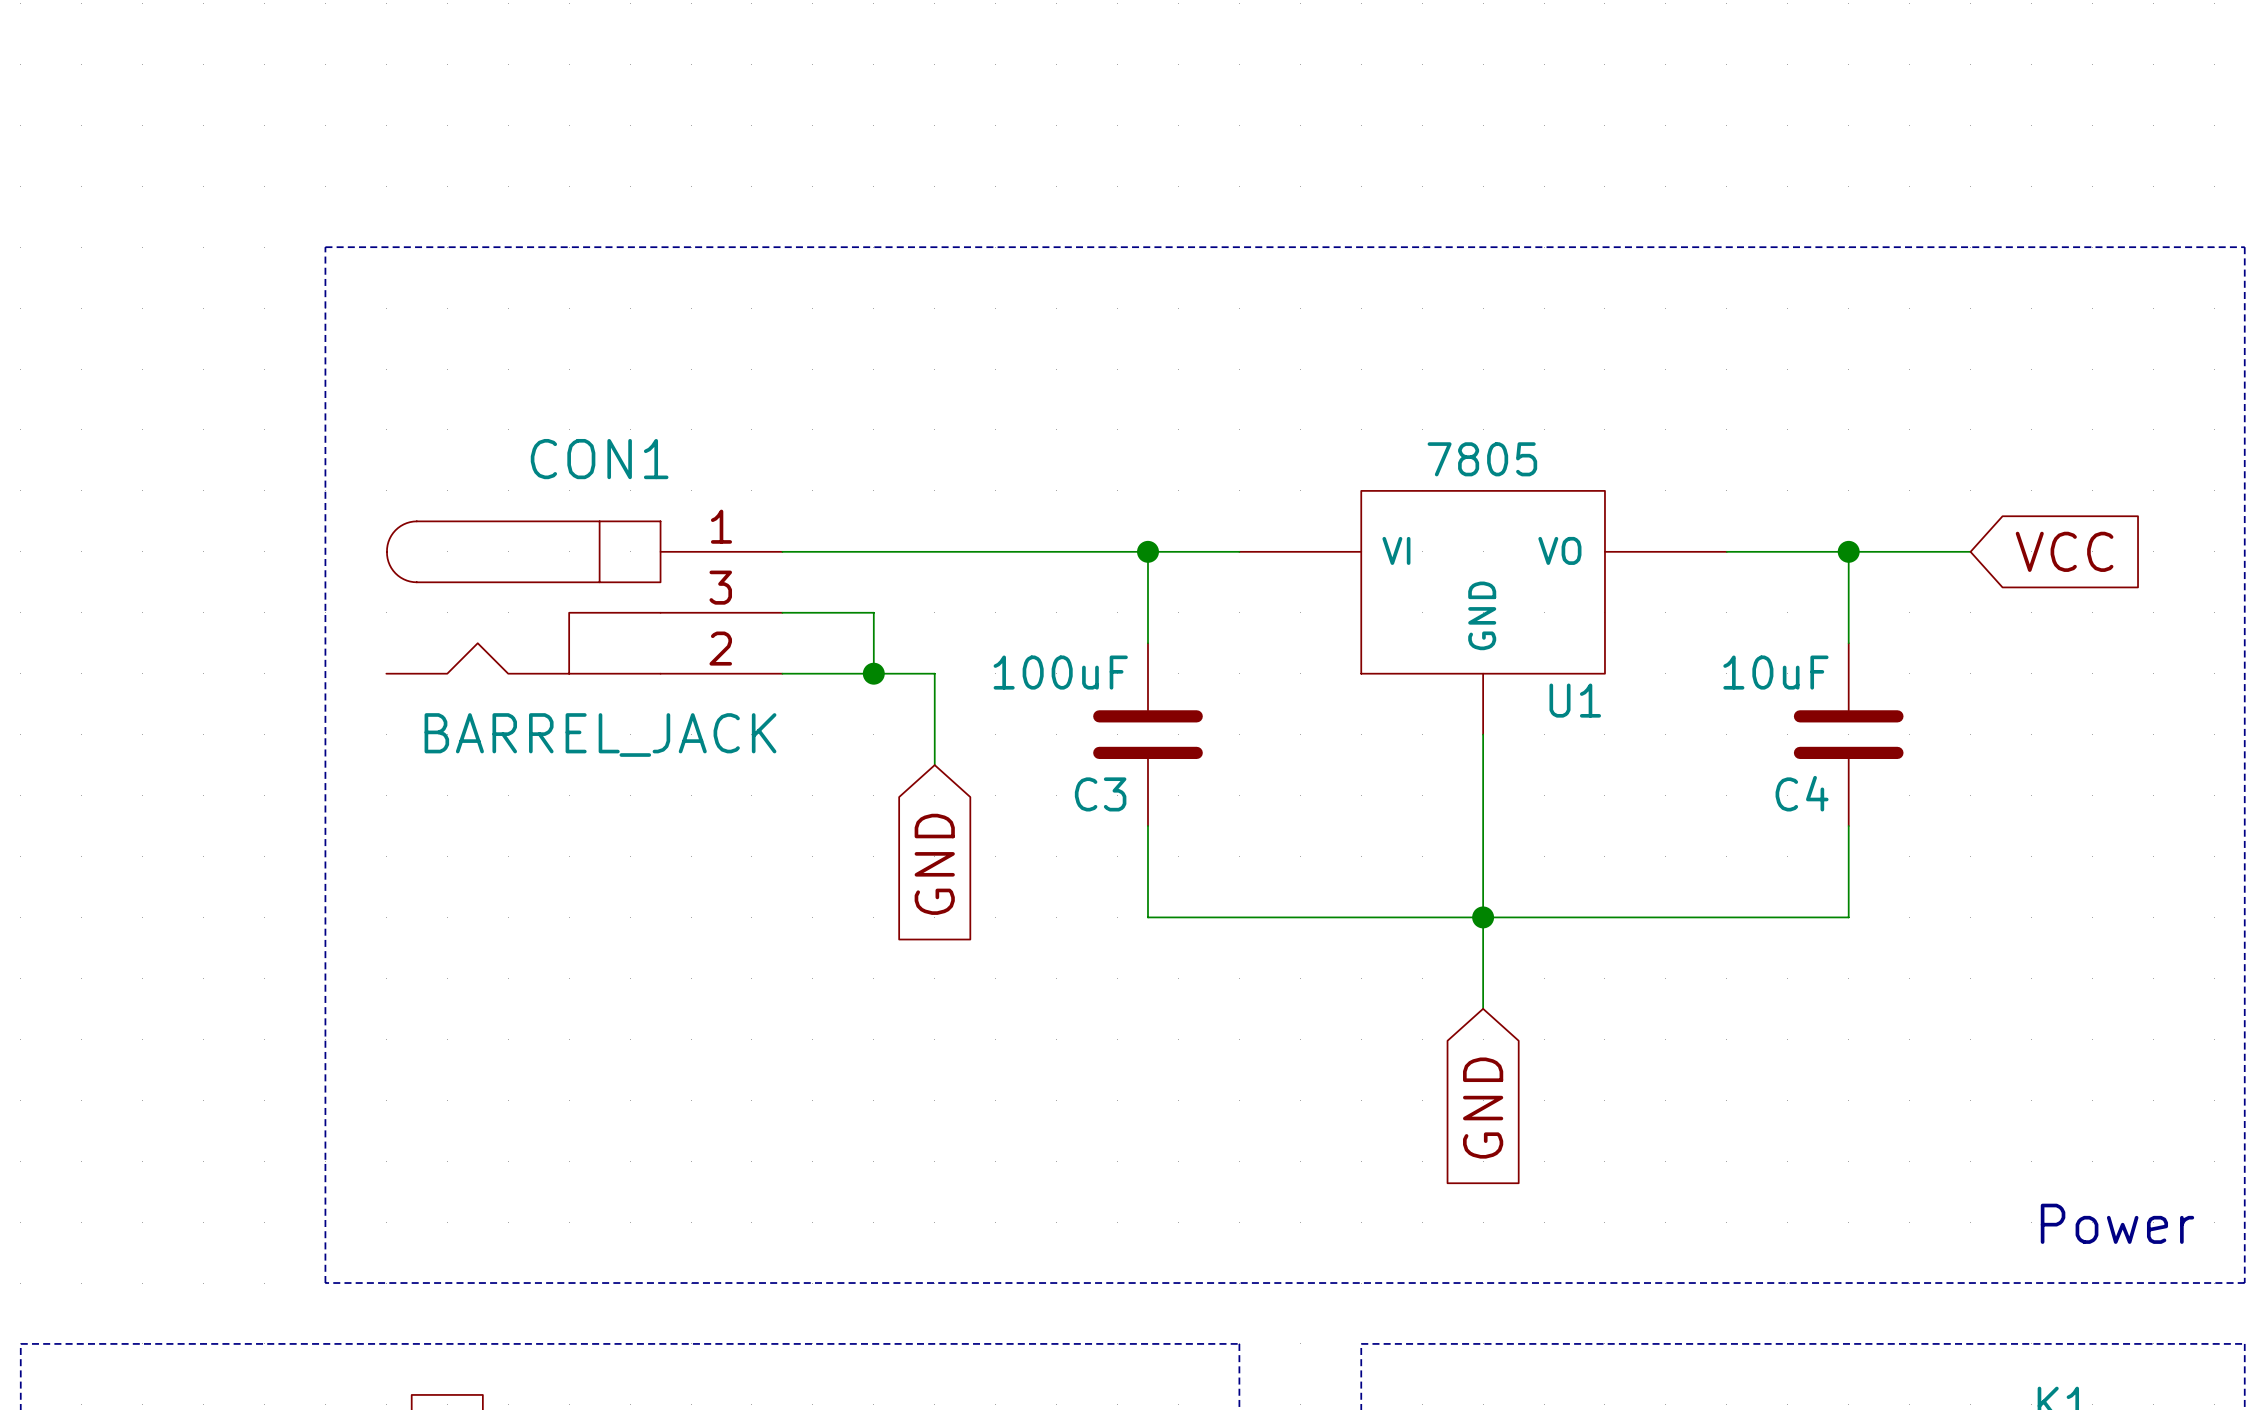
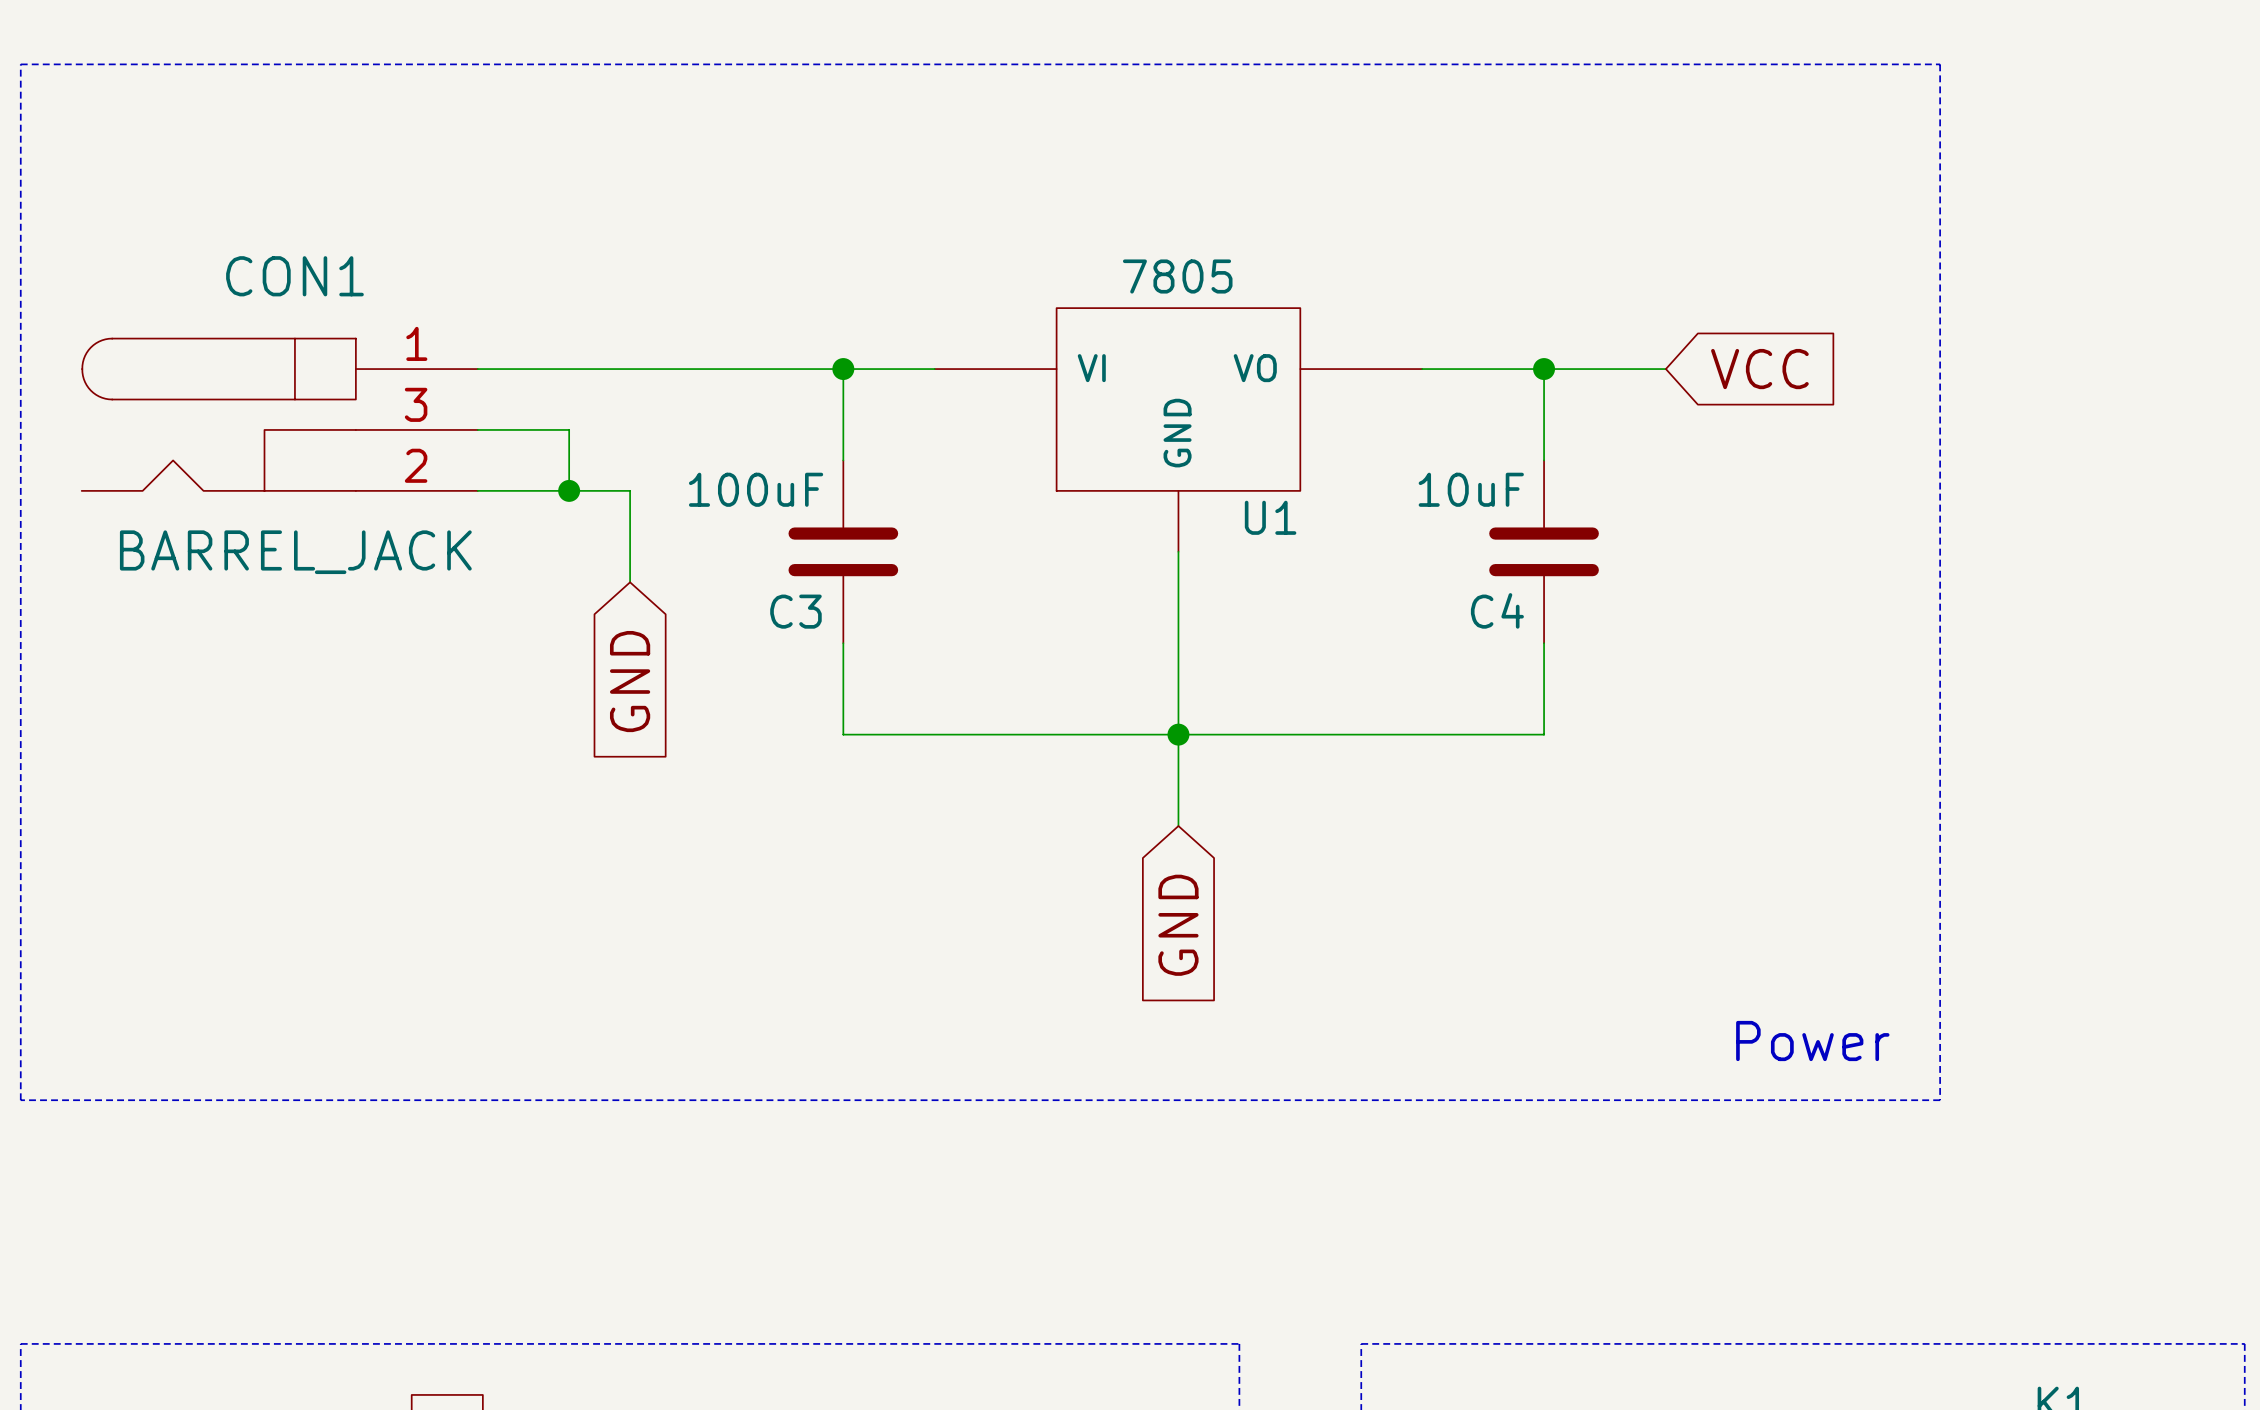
line: (325, 247) (2244, 247) (2244, 1283) (325, 1283) (325, 247) -> (20, 64) (1940, 64) (1940, 1100) (20, 1100) (20, 64)
junction: none -> (843, 369)
junction: none -> (1544, 369)
junction: none -> (569, 490)
wire: (782, 551) (1239, 551) -> (477, 369) (934, 369)
wire: (1147, 551) (1147, 643) -> (843, 369) (843, 460)
junction: (1147, 551) -> none
wire: (1726, 551) (1970, 551) -> (1422, 369) (1665, 369)
wire: (1848, 551) (1848, 643) -> (1544, 369) (1544, 460)
junction: (1848, 551) -> none
global label position: VCC (2064, 551) -> VCC (1759, 369)
CON1 position: (584, 597) -> (279, 414)
wire: (782, 612) (873, 612) (873, 673) -> (477, 429) (569, 429) (569, 490)
U1 position: (1483, 612) -> (1178, 429)
wire: (782, 673) (934, 673) (934, 765) -> (477, 490) (630, 490) (630, 582)
junction: (873, 673) -> none
global label: none -> GND (630, 681)
C3 position: (1147, 734) -> (843, 551)
junction: none -> (1178, 734)
wire: (1483, 734) (1483, 1008) -> (1178, 551) (1178, 826)
C4 position: (1848, 734) -> (1544, 551)
wire: (1147, 826) (1147, 917) (1848, 917) (1848, 826) -> (843, 643) (843, 734) (1544, 734) (1544, 643)
global label: GND (934, 864) -> none
junction: (1483, 917) -> none
global label: none -> GND (1178, 925)
global label: GND (1483, 1108) -> none
text position: Power (2117, 1223) -> Power (1812, 1041)

